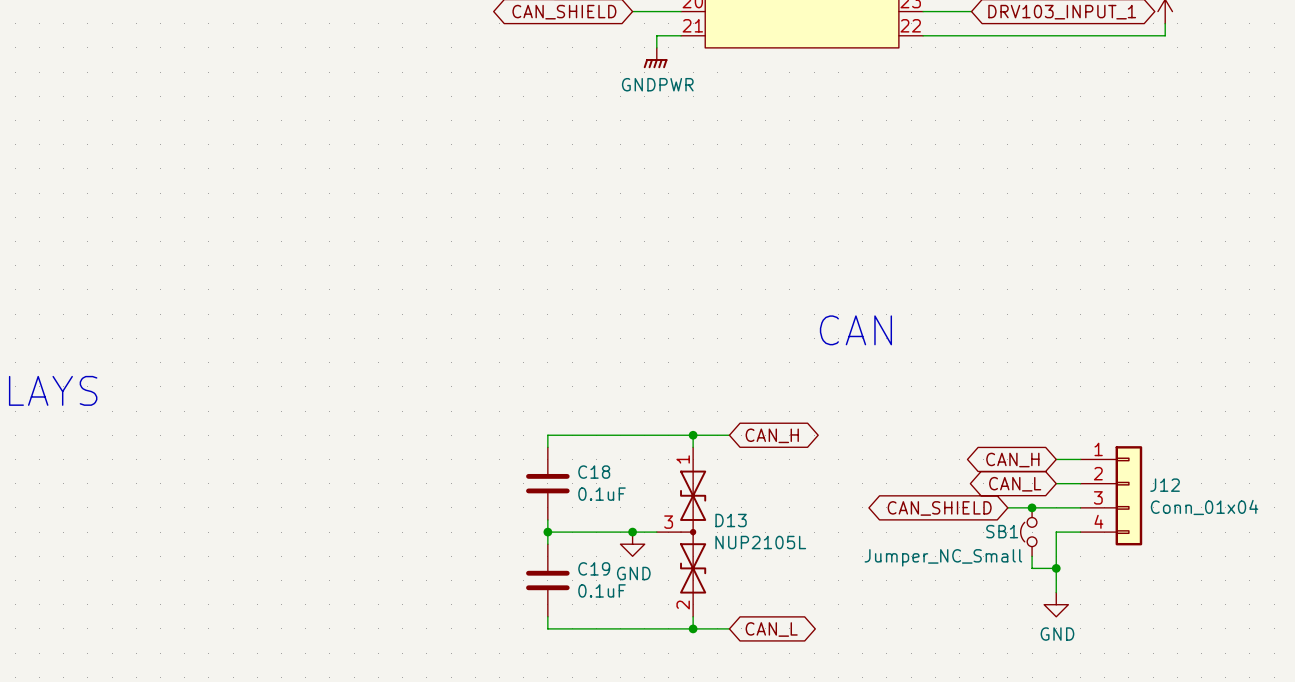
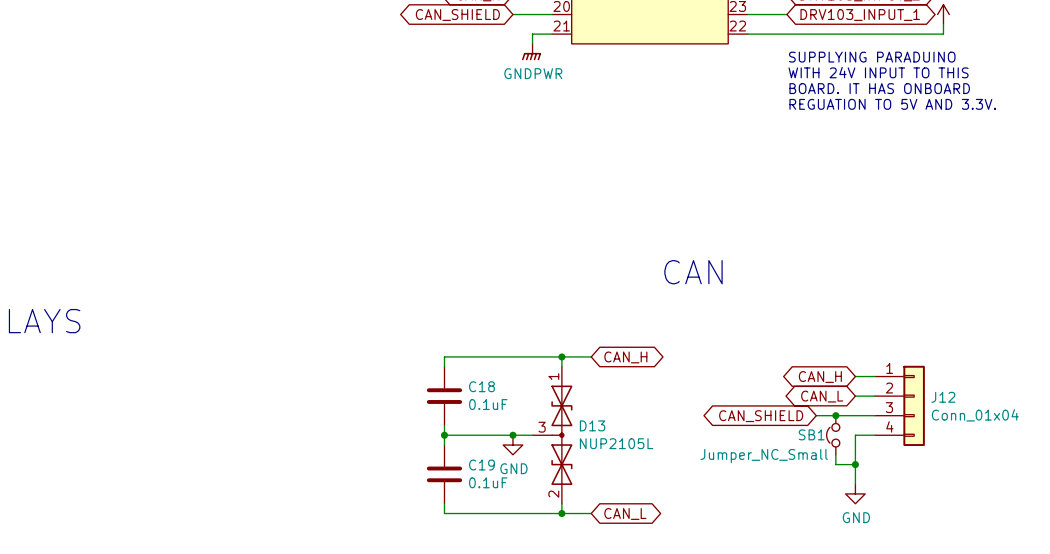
text: none -> SUPPLYING PARADUINO (872, 57)
text: none -> WITH 24V INPUT TO THIS (878, 72)
text: none -> BOARD. IT HAS ONBOARD (879, 88)
text: none -> REGUATION TO 5V AND 3.3V. (892, 104)

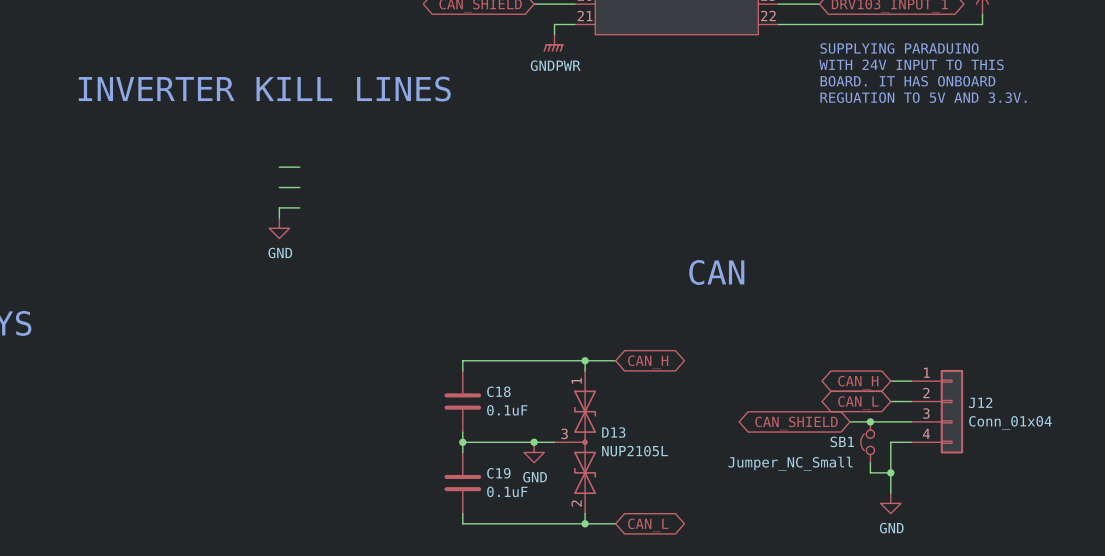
text: none -> INVERTER KILL LINES (264, 89)
wire: none -> (279, 167) (299, 167)
wire: none -> (279, 187) (299, 187)
wire: none -> (299, 207) (279, 207) (279, 218)
power symbol: none -> GND (279, 228)

